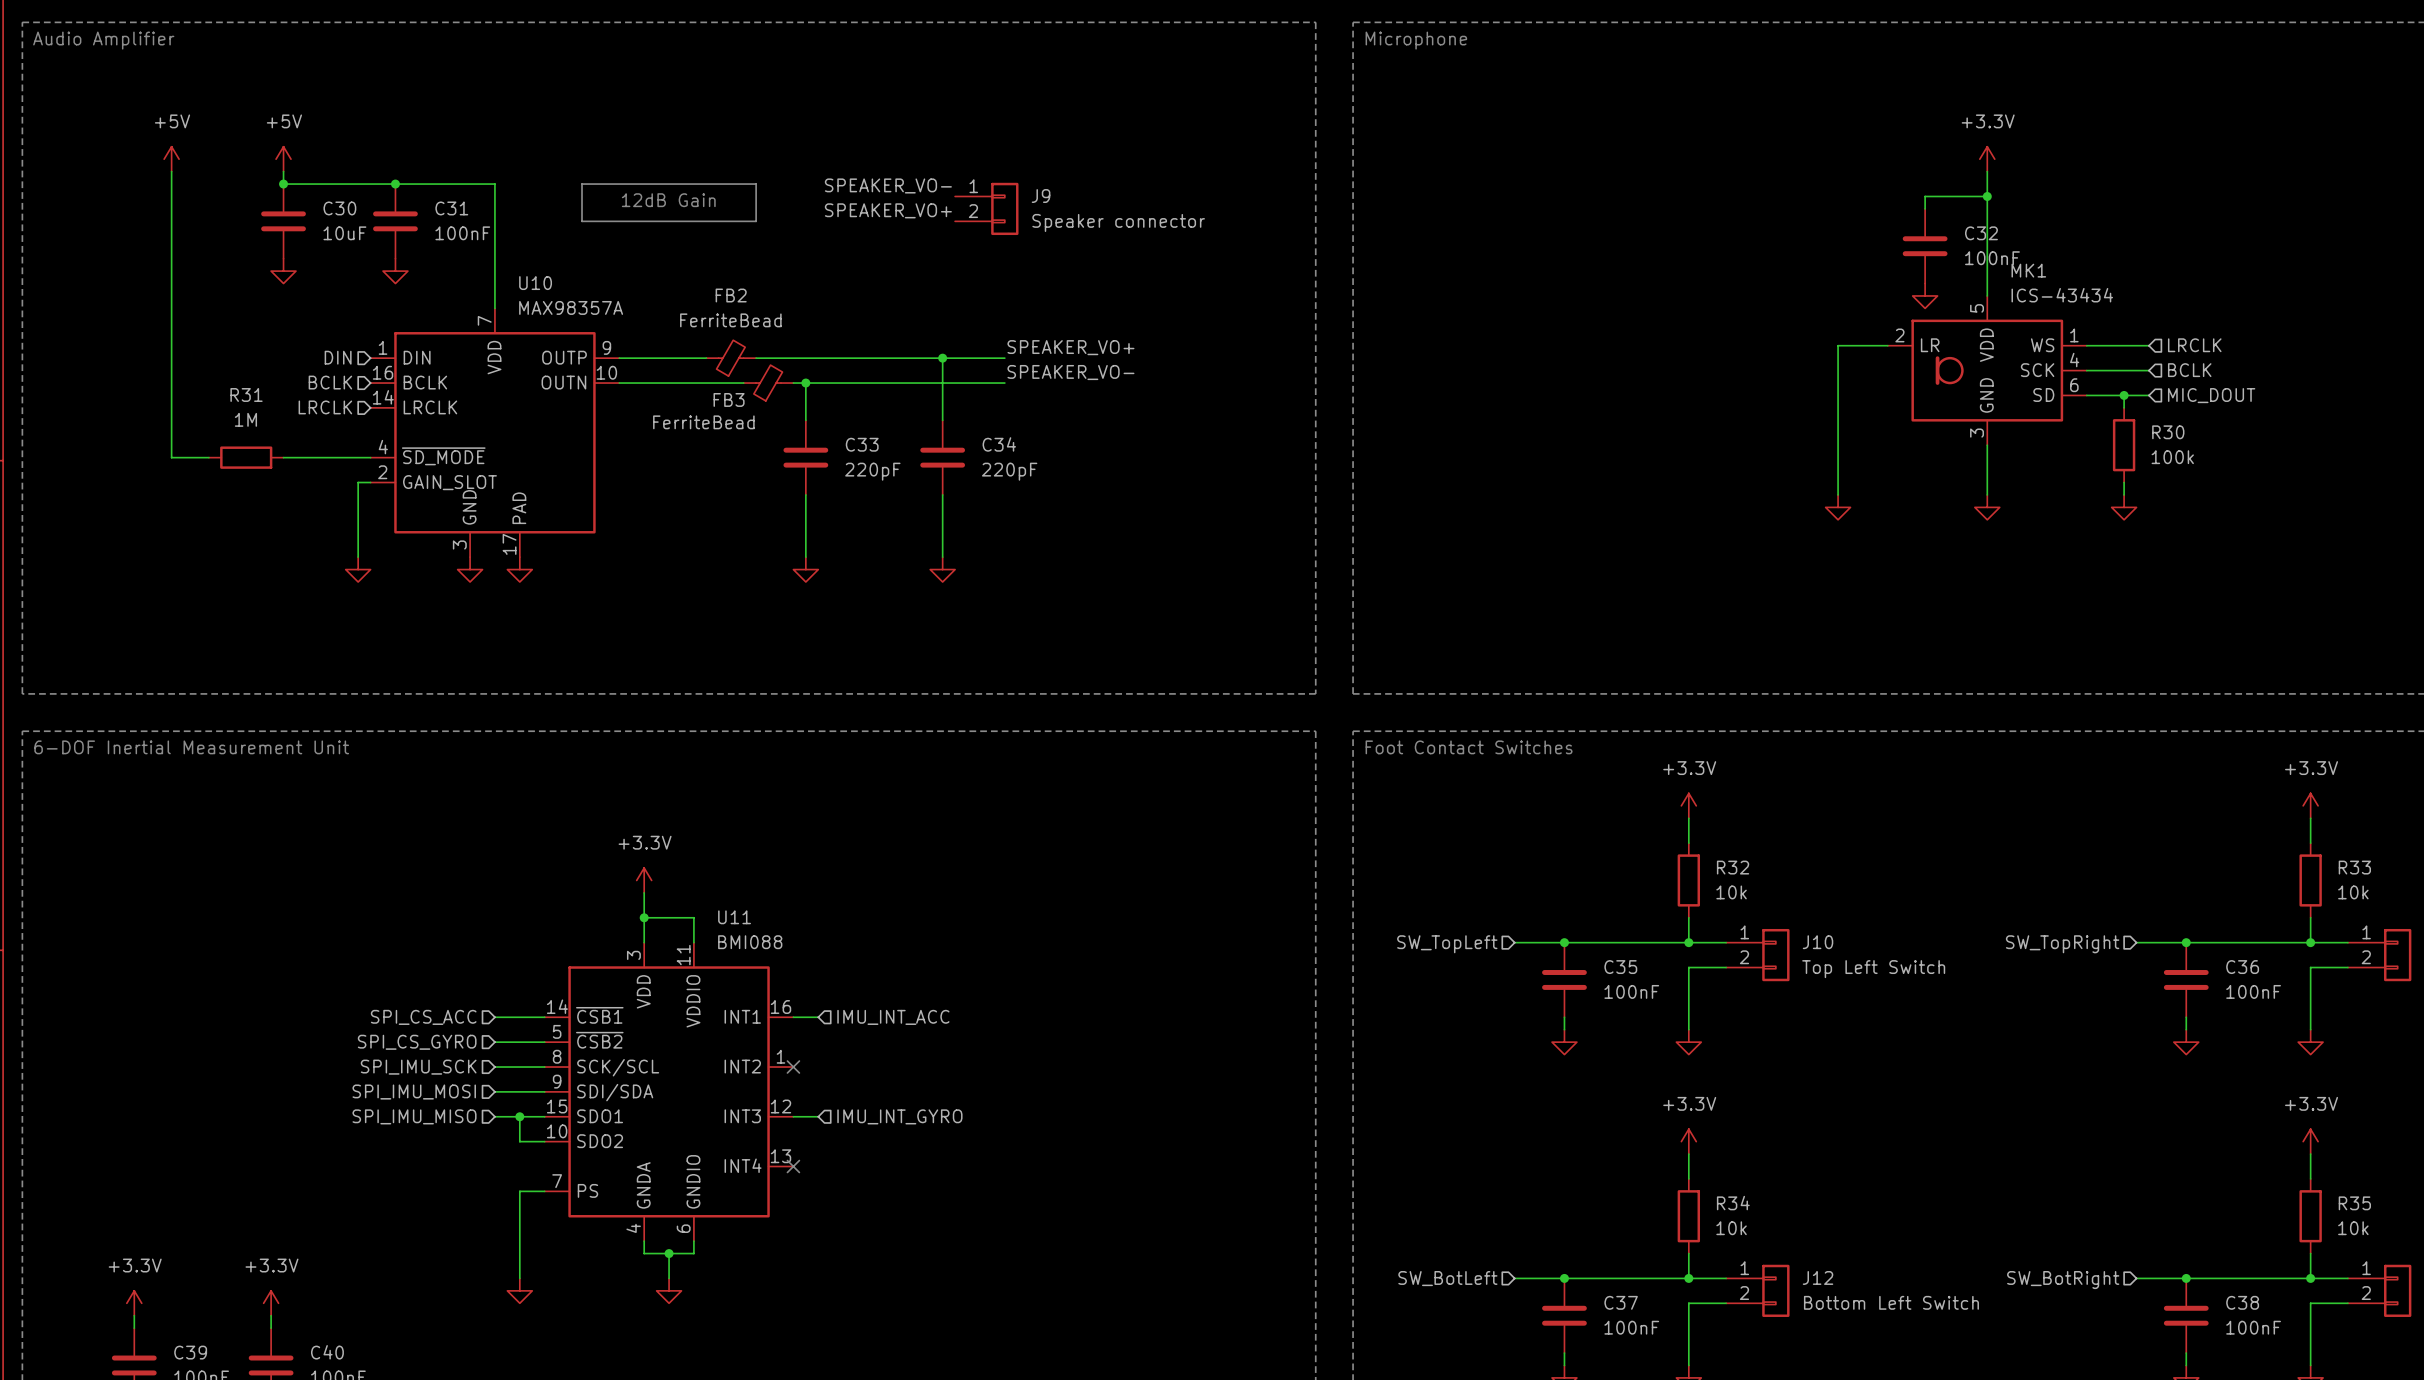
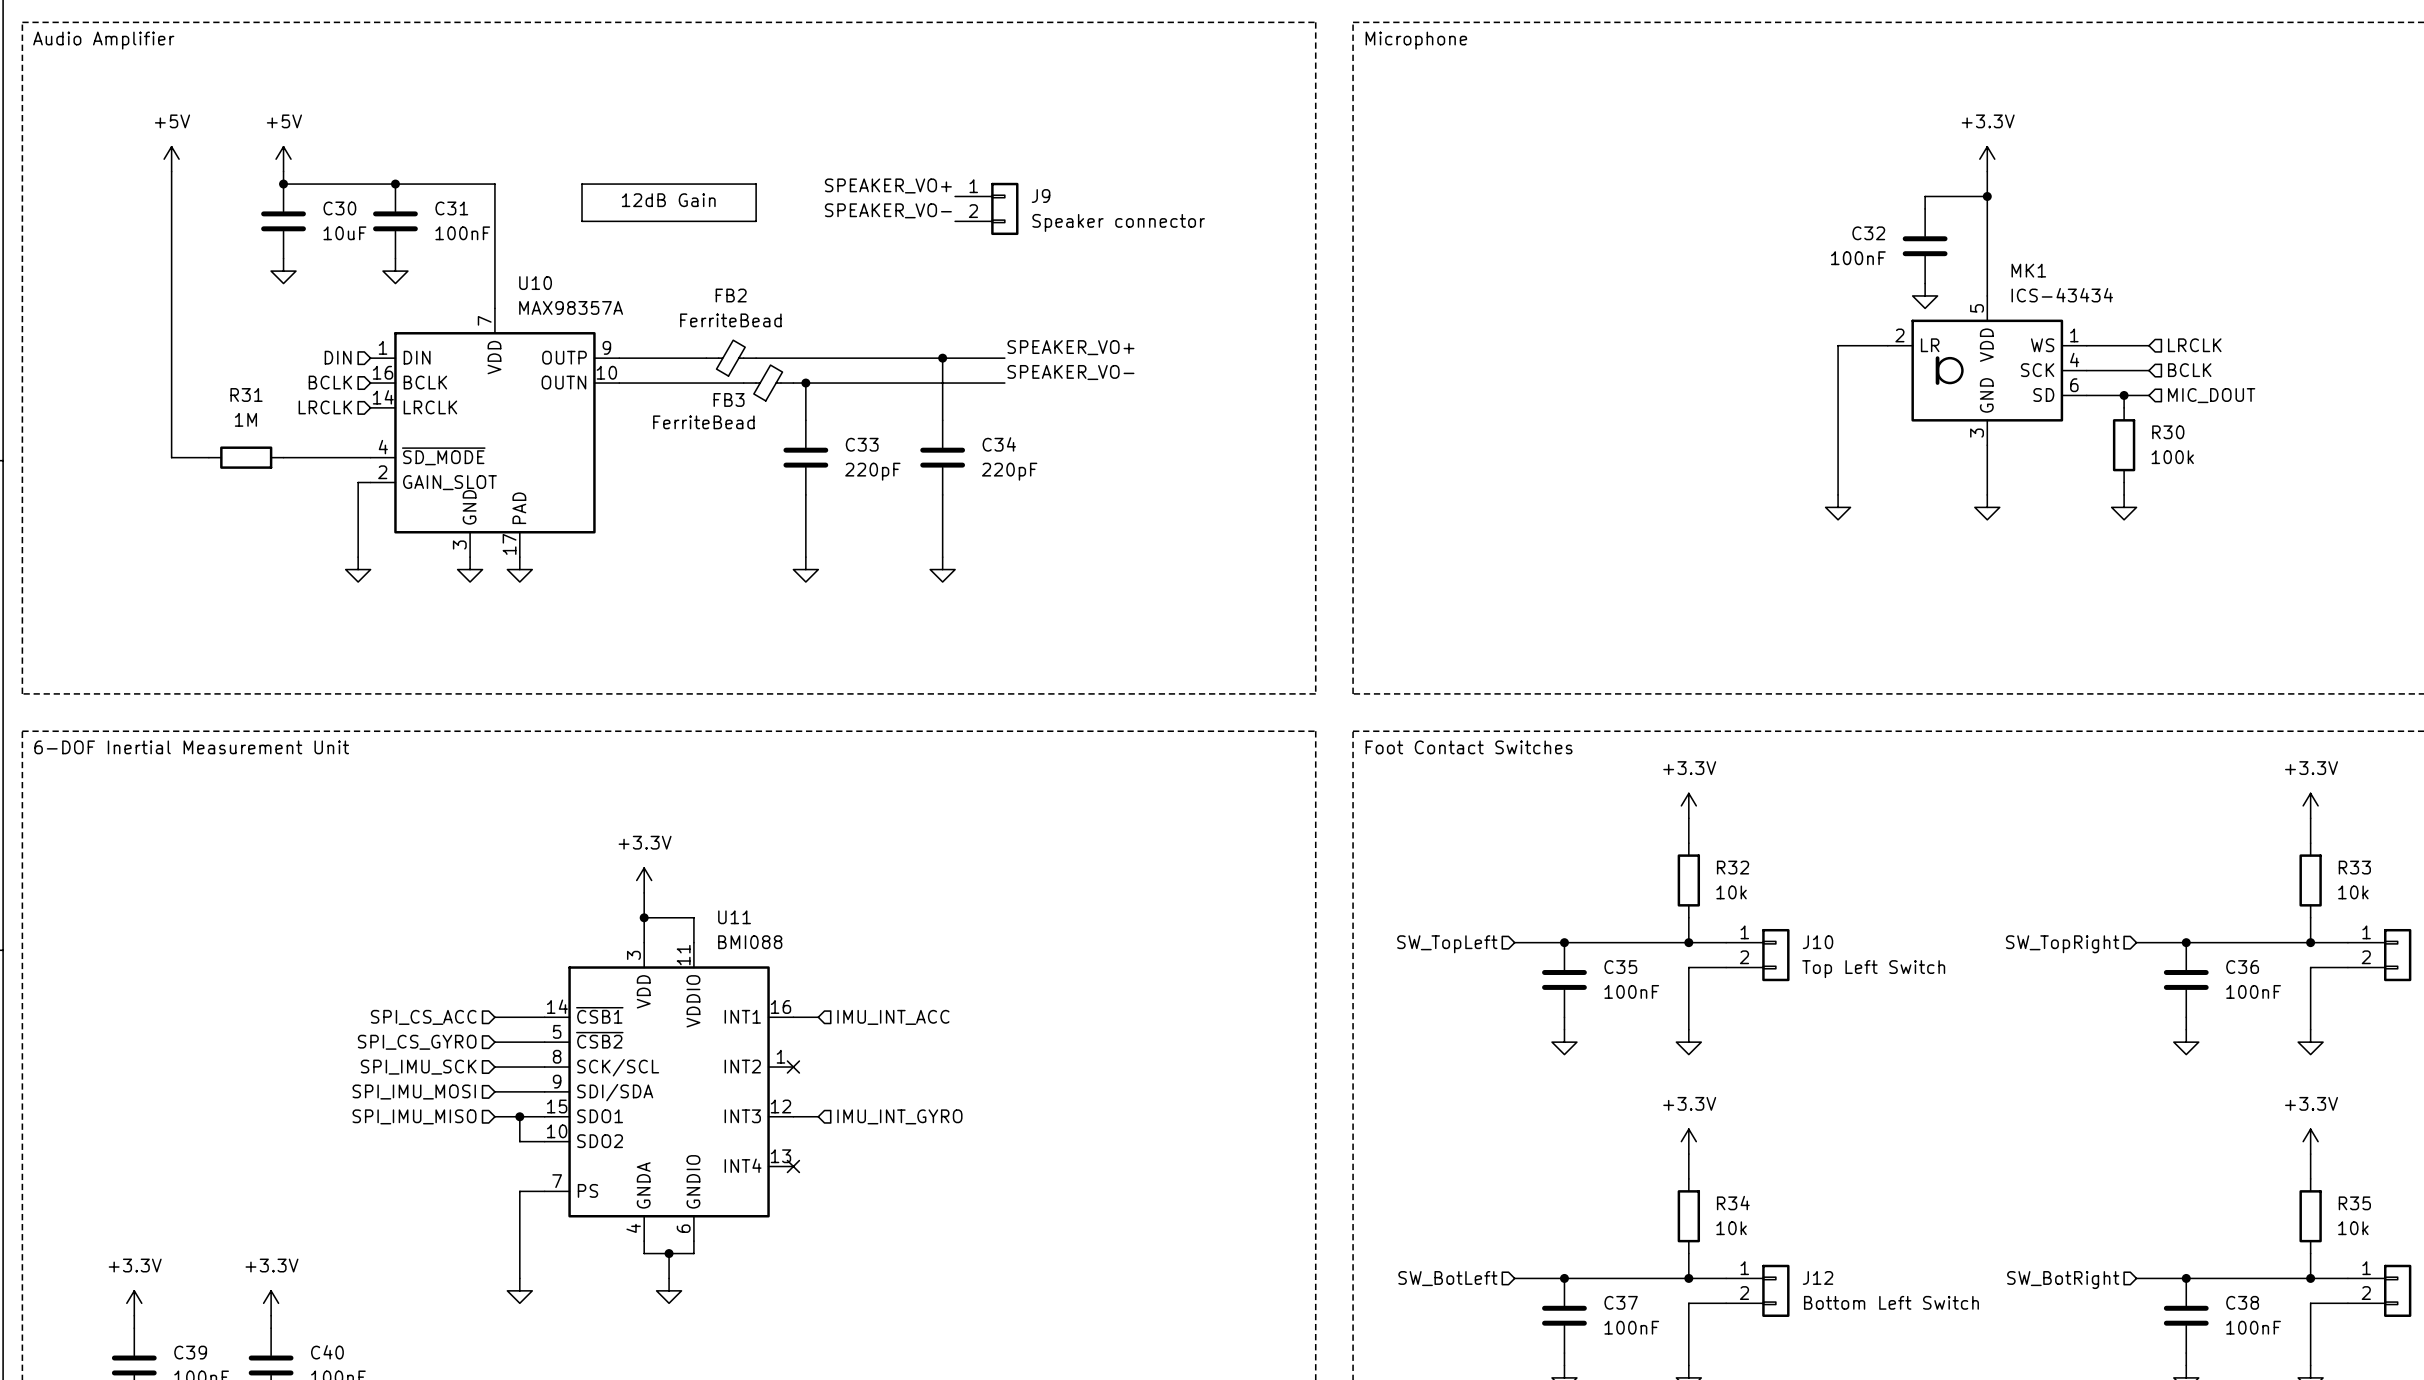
label: SPEAKER_VO- (888, 185) -> SPEAKER_VO+ (888, 185)
label: SPEAKER_VO+ (888, 210) -> SPEAKER_VO- (888, 210)
C32 name position: C32 (1981, 233) -> C32 (1868, 233)
C32 value position: 100nF (1992, 258) -> 100nF (1858, 258)

